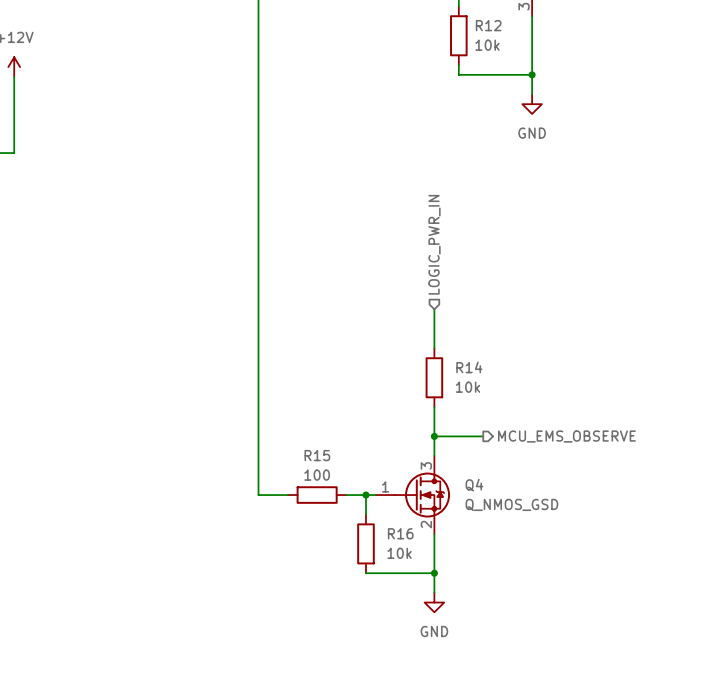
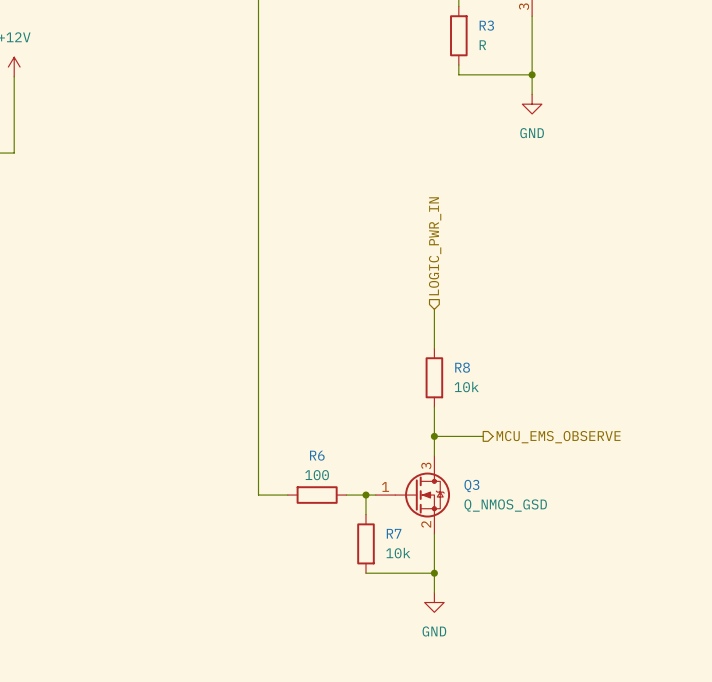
R12 name: R12 (488, 25) -> R3 (486, 25)
R12 value: 10k (487, 45) -> R (482, 45)
R14 name: R14 (469, 367) -> R8 (462, 367)
R15 name: R15 (317, 455) -> R6 (317, 455)
Q4 name: Q4 (474, 485) -> Q3 (471, 485)
R16 name: R16 (400, 533) -> R7 (394, 533)

